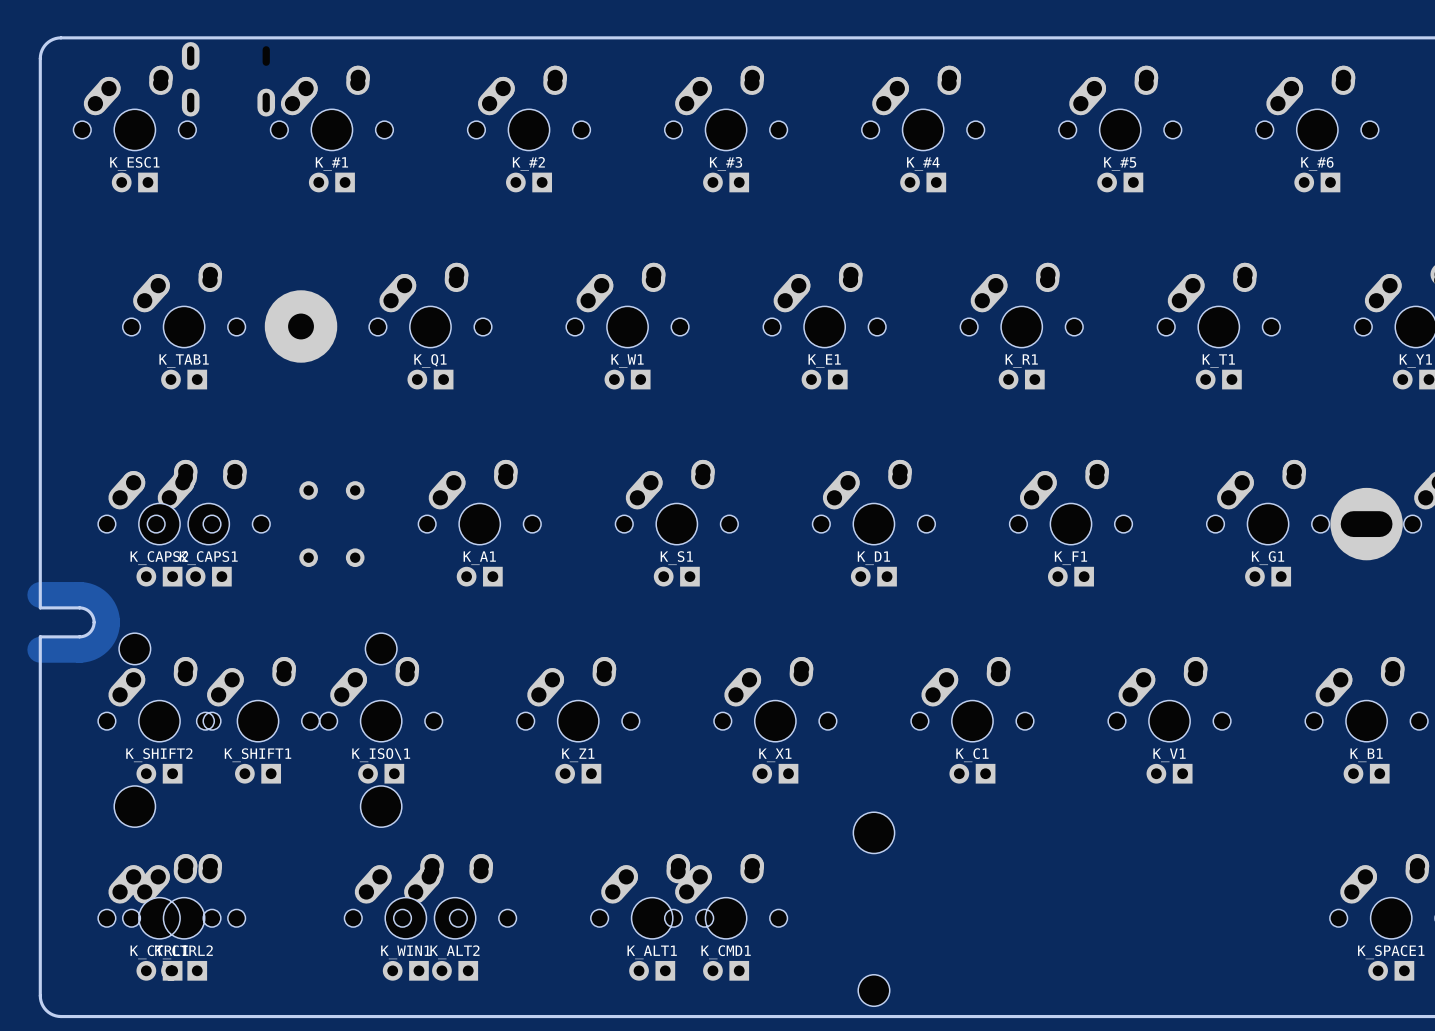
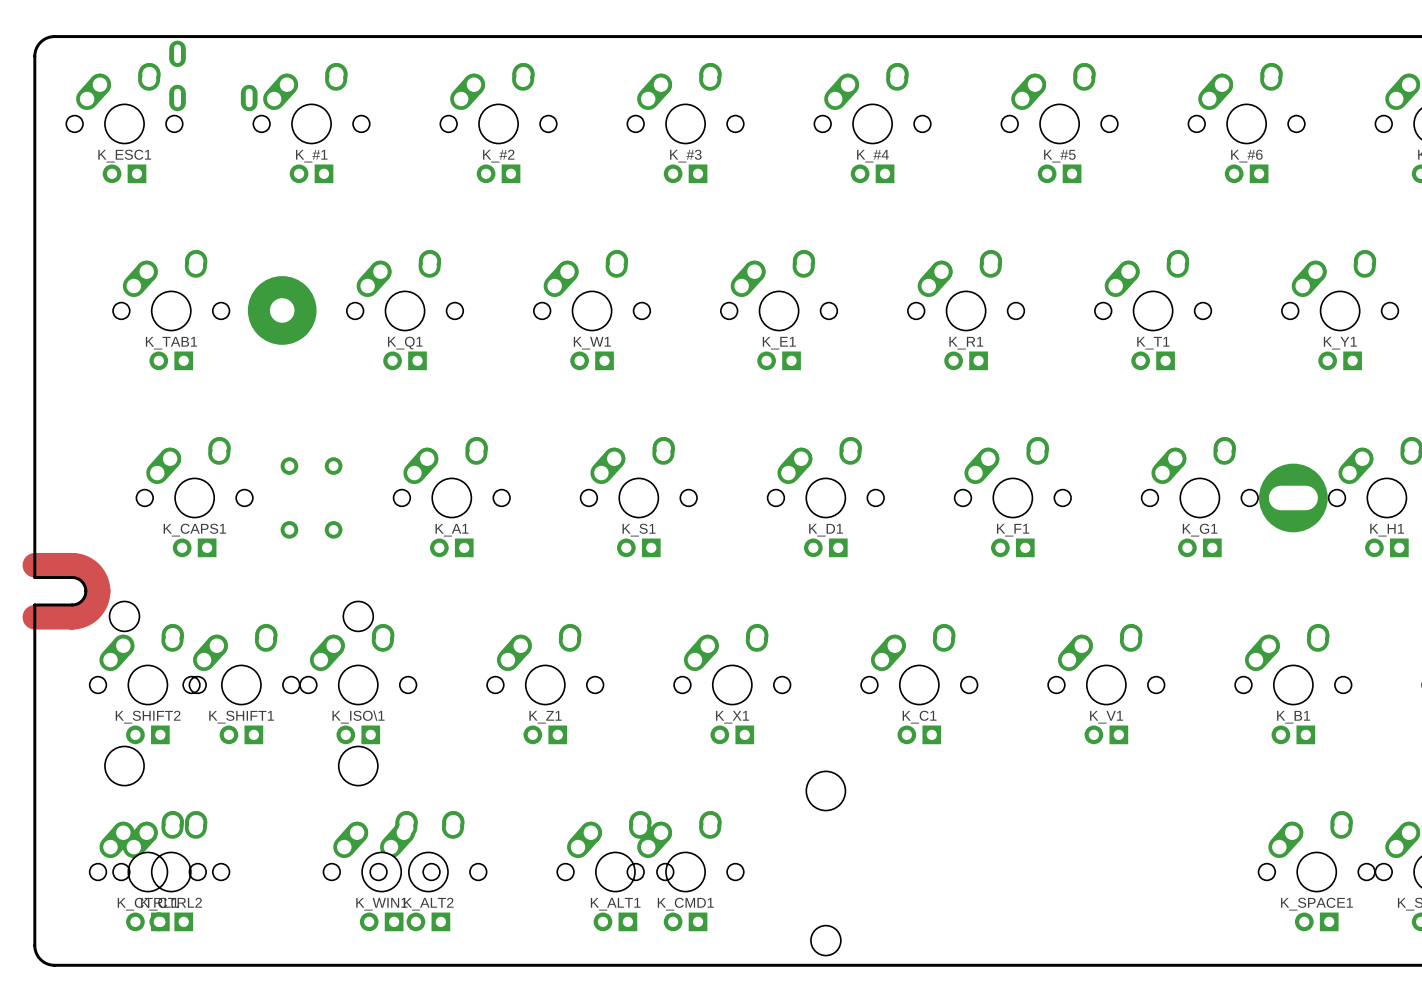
K_CAPS2: (159, 523) -> none

